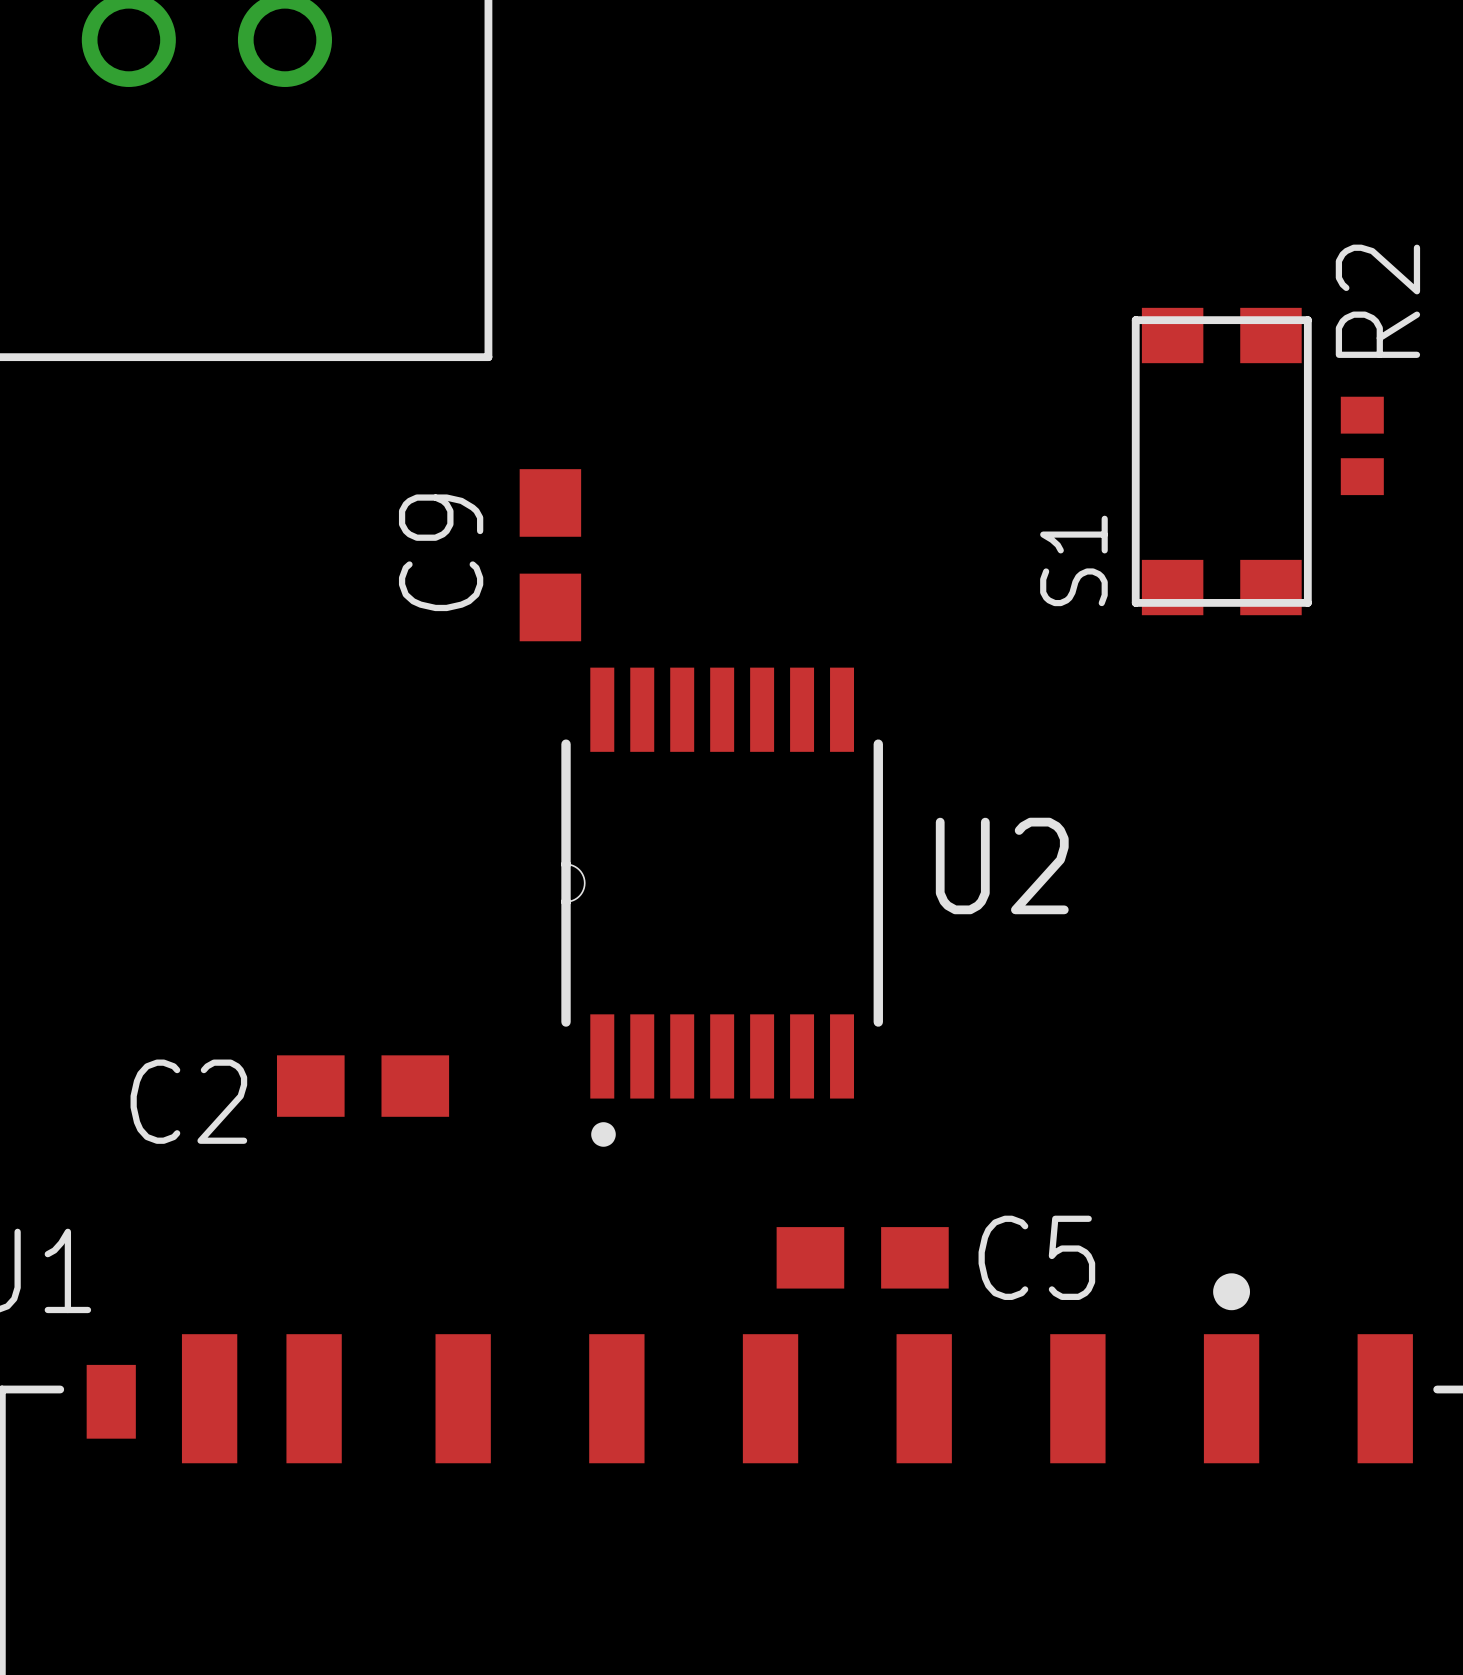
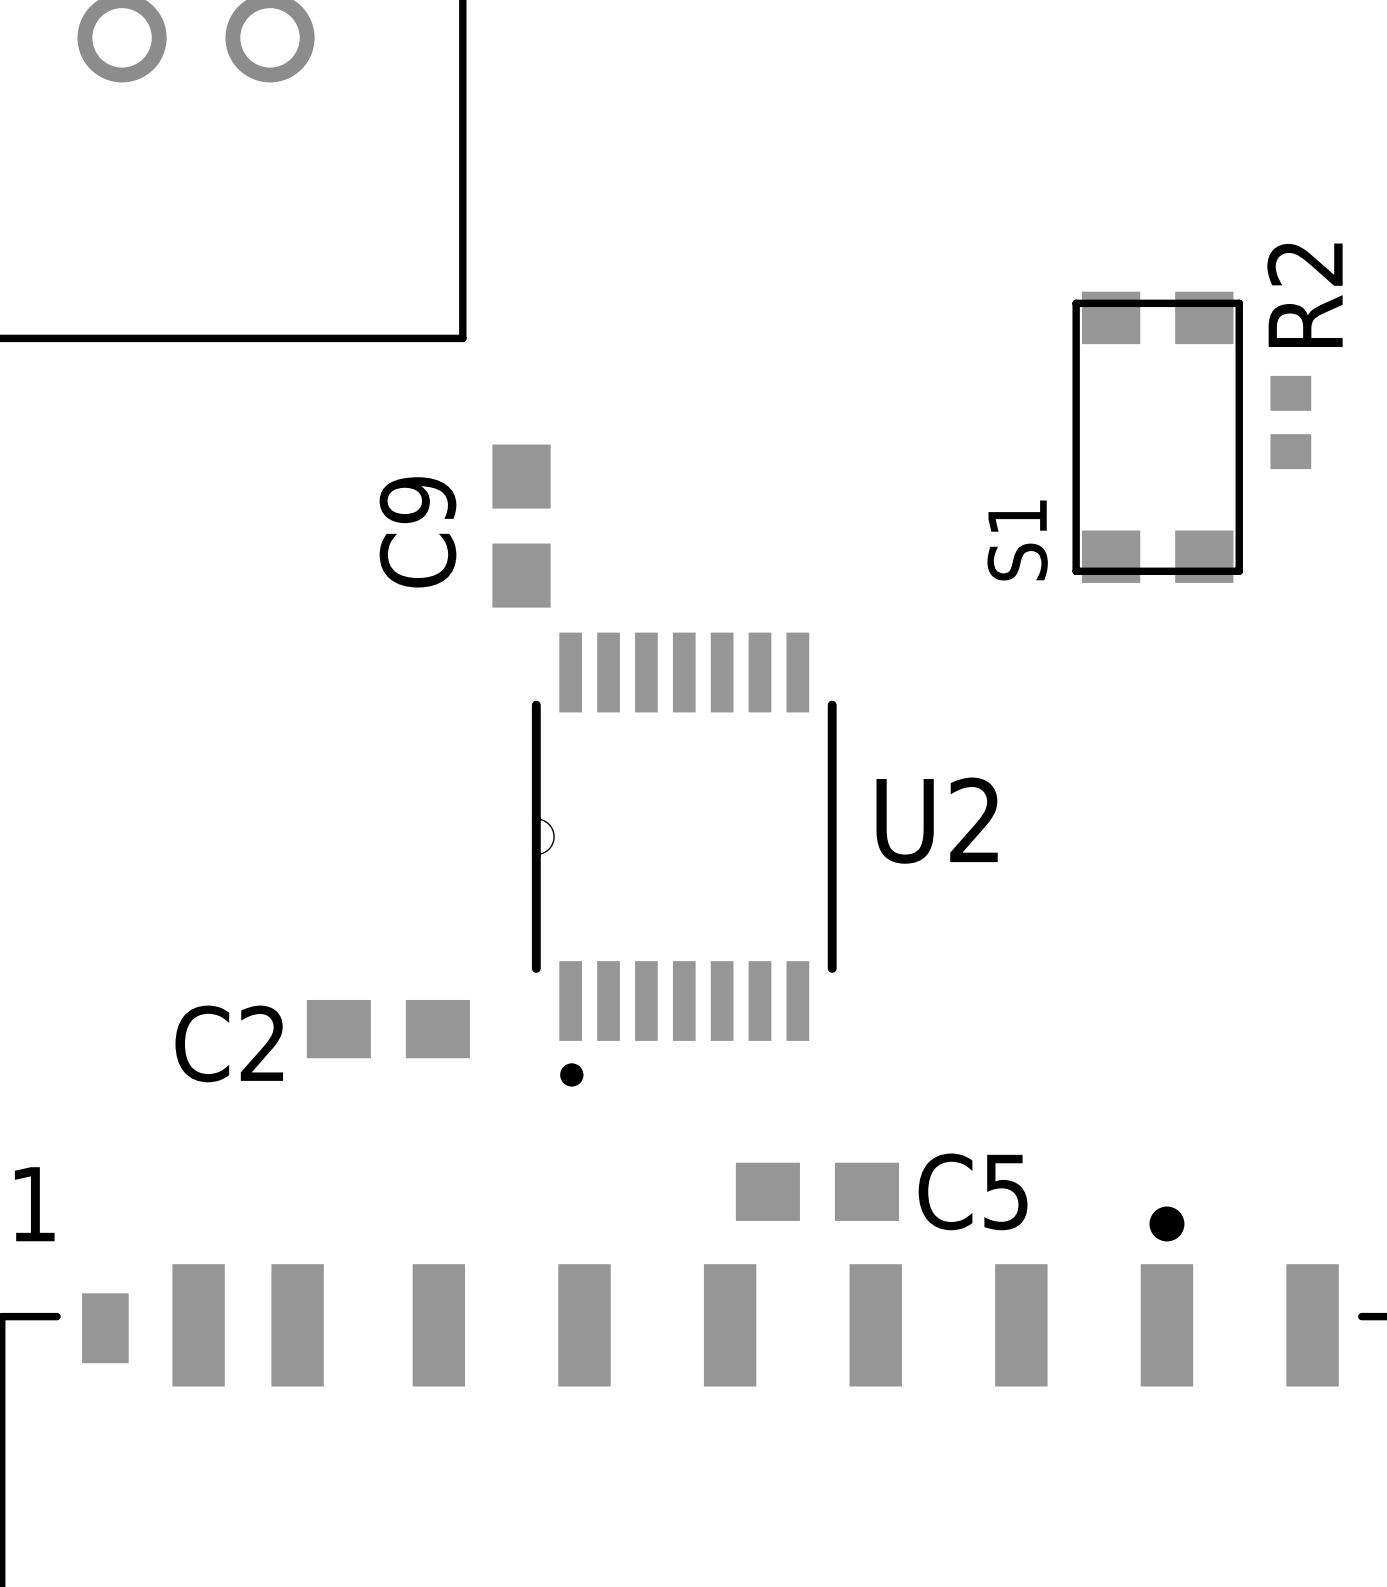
C2 position: (363, 1086) -> (388, 1029)

